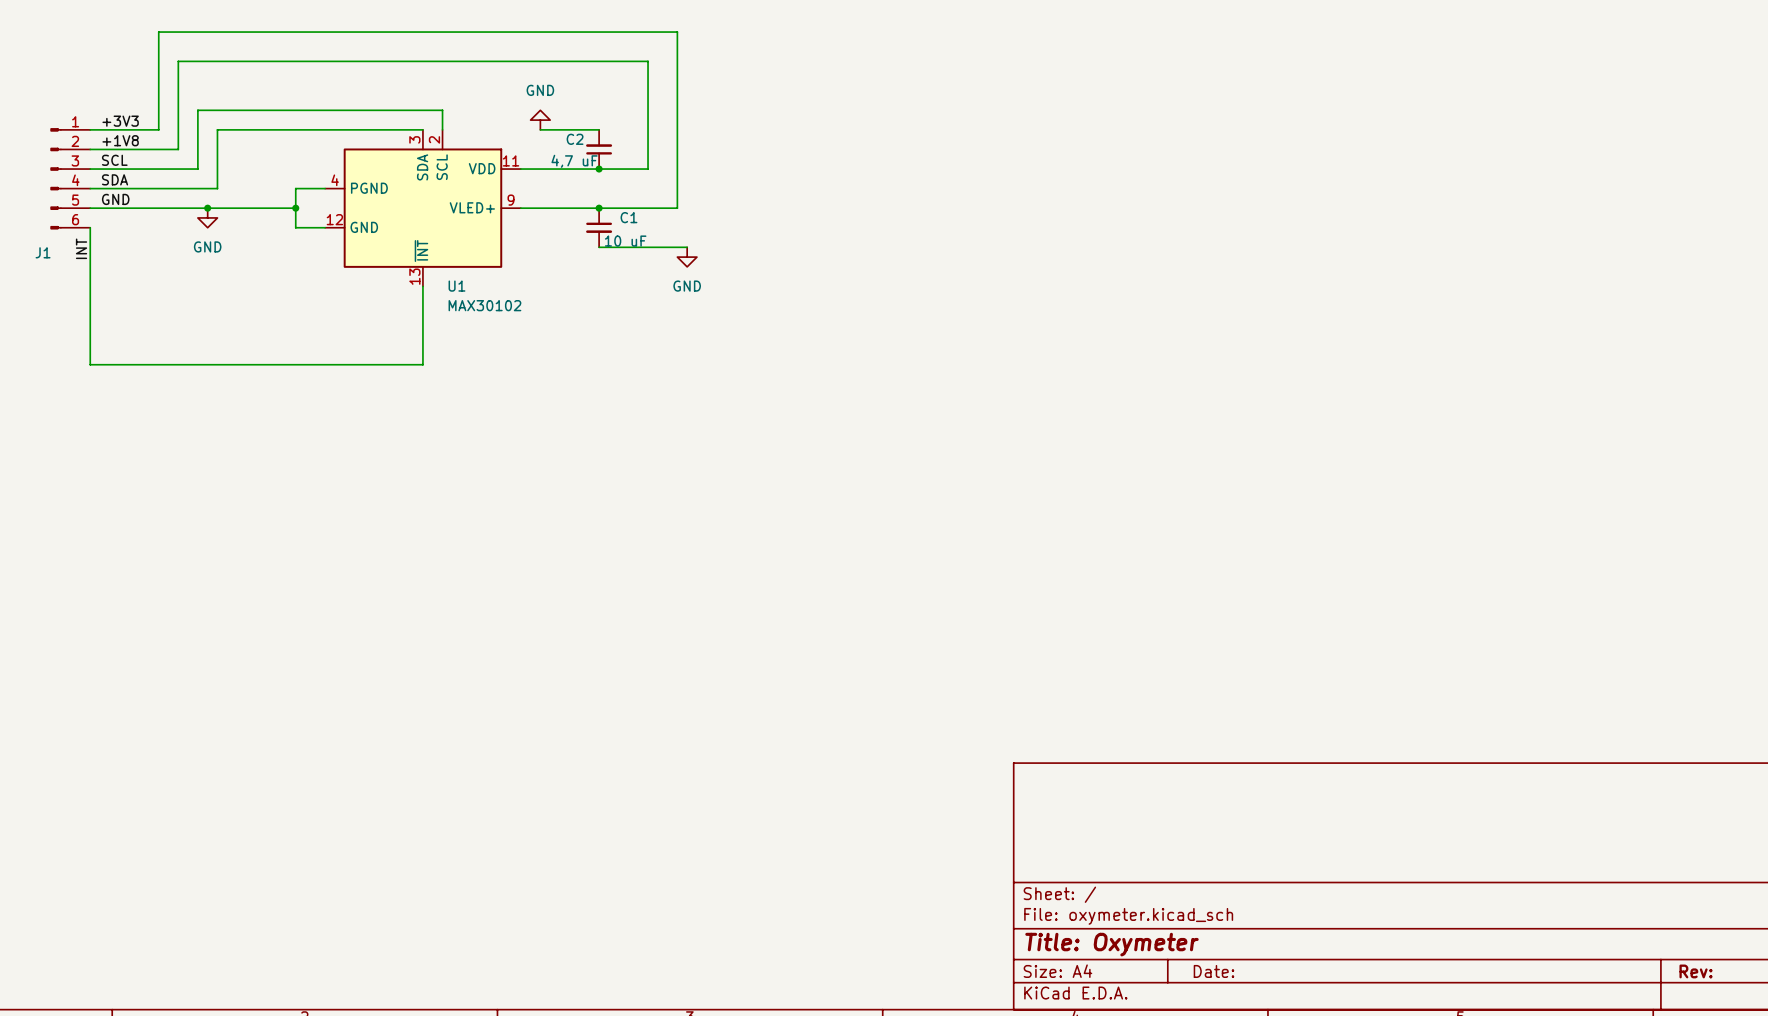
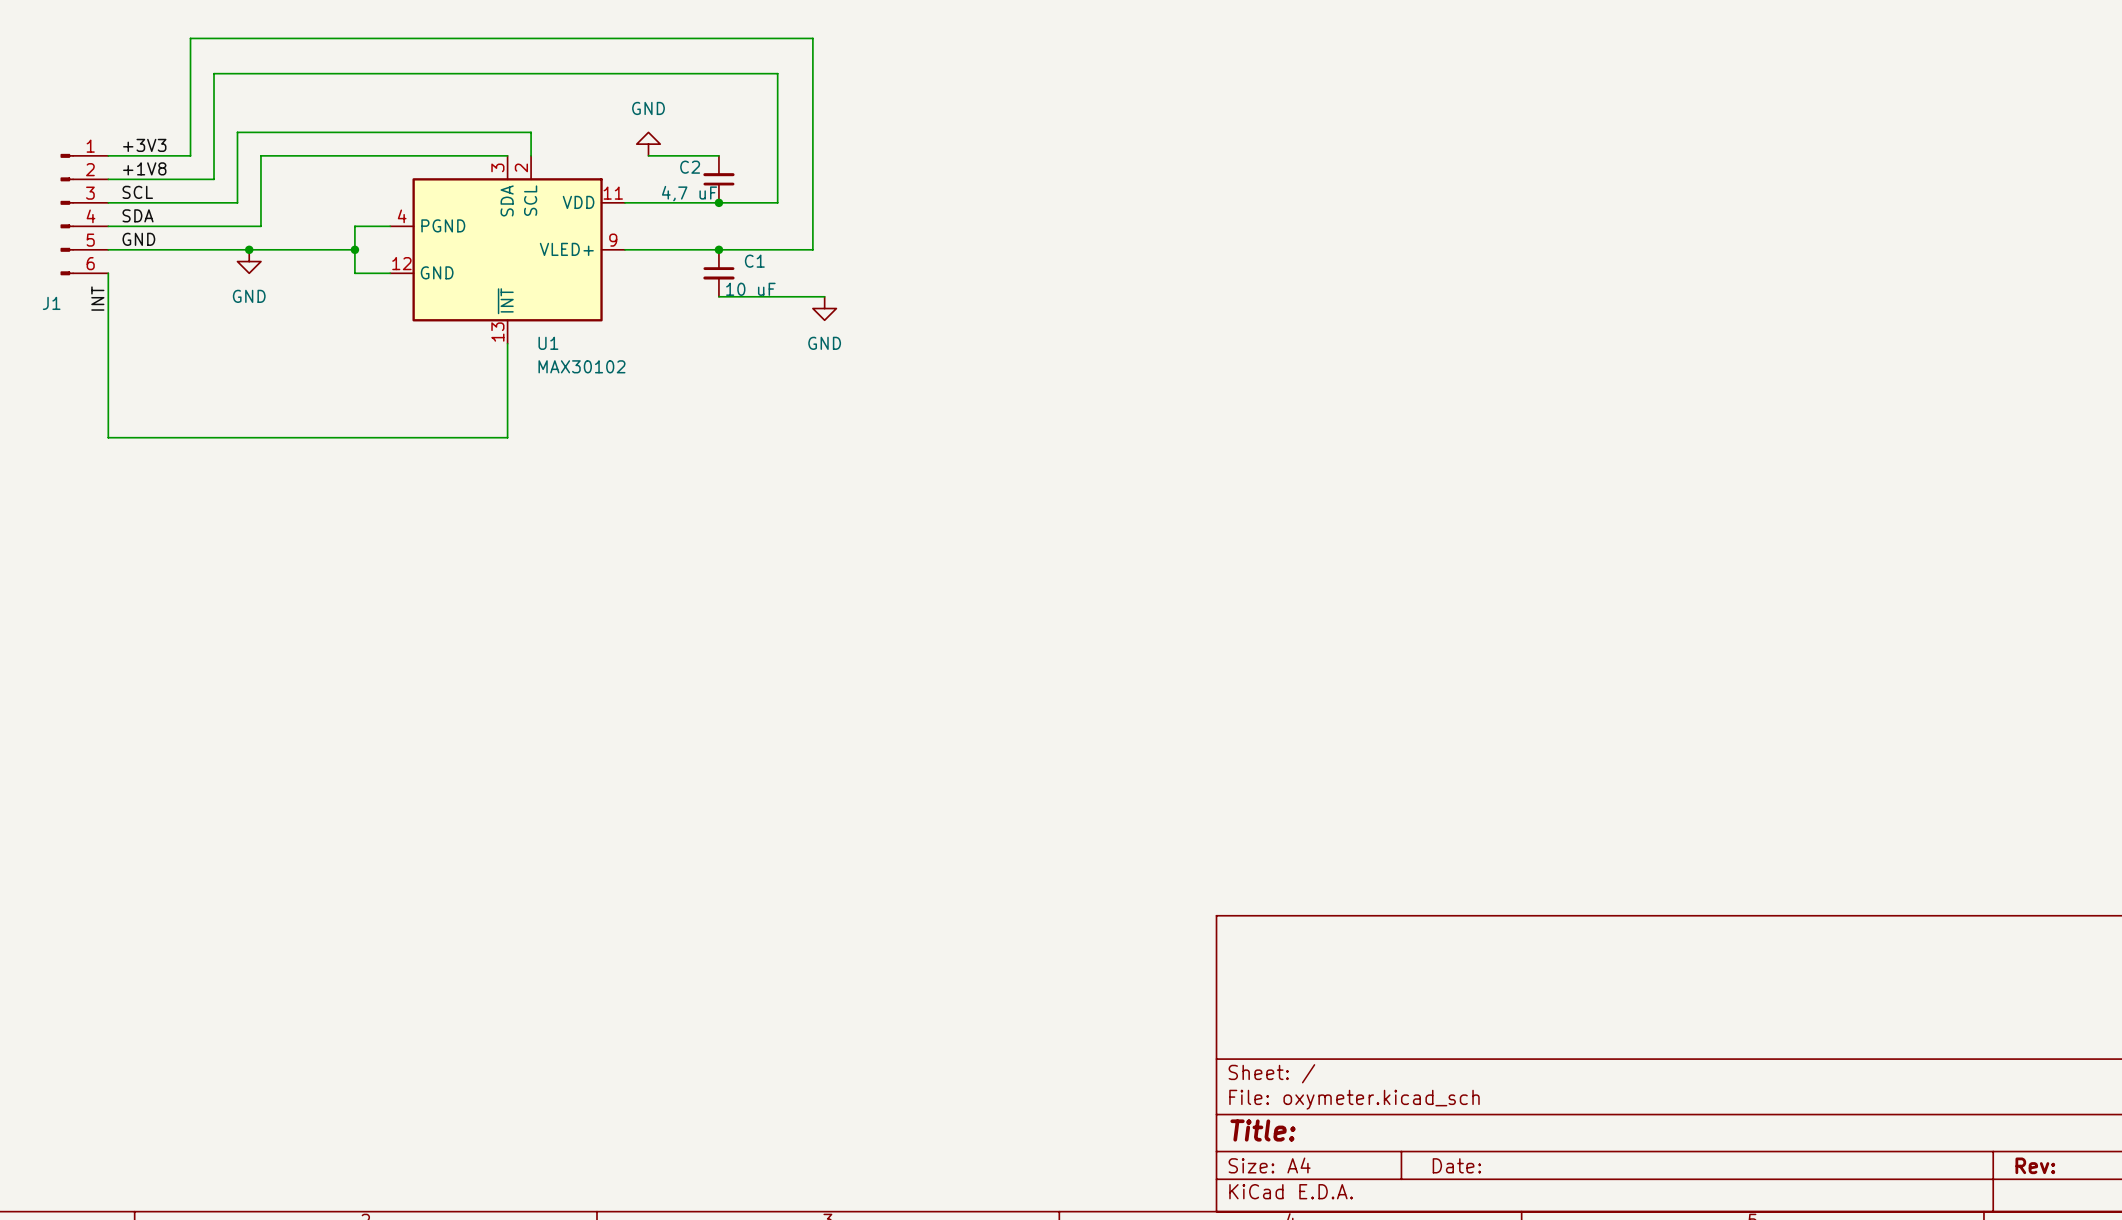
title block: Title: Oxymeter (1111, 944) -> Title: (1263, 1130)

